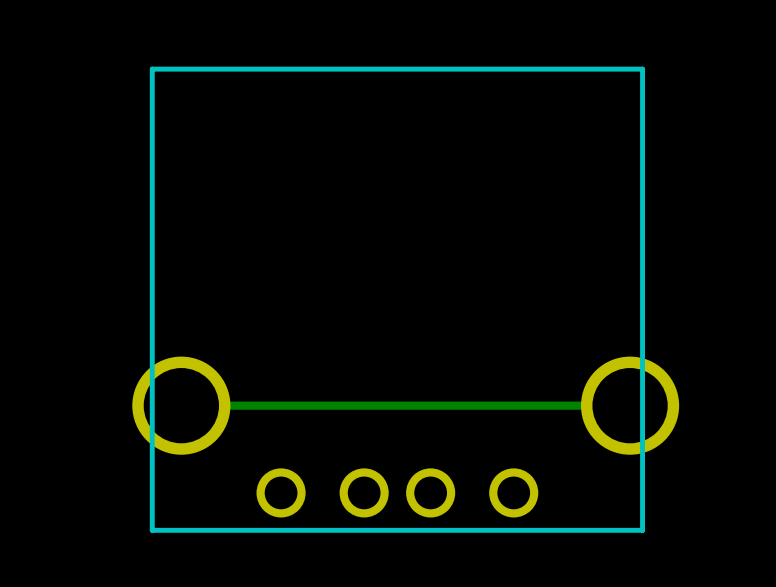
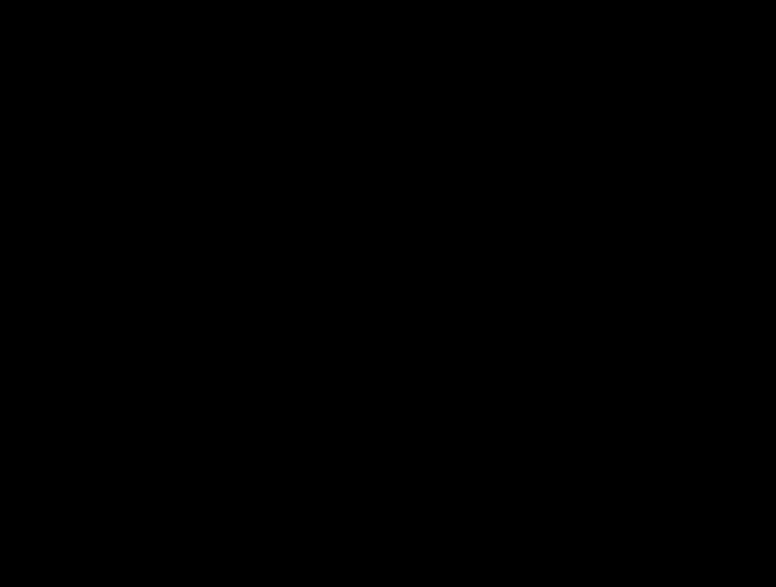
part: (405, 299) -> none
track: (630, 405) (181, 405) -> none

